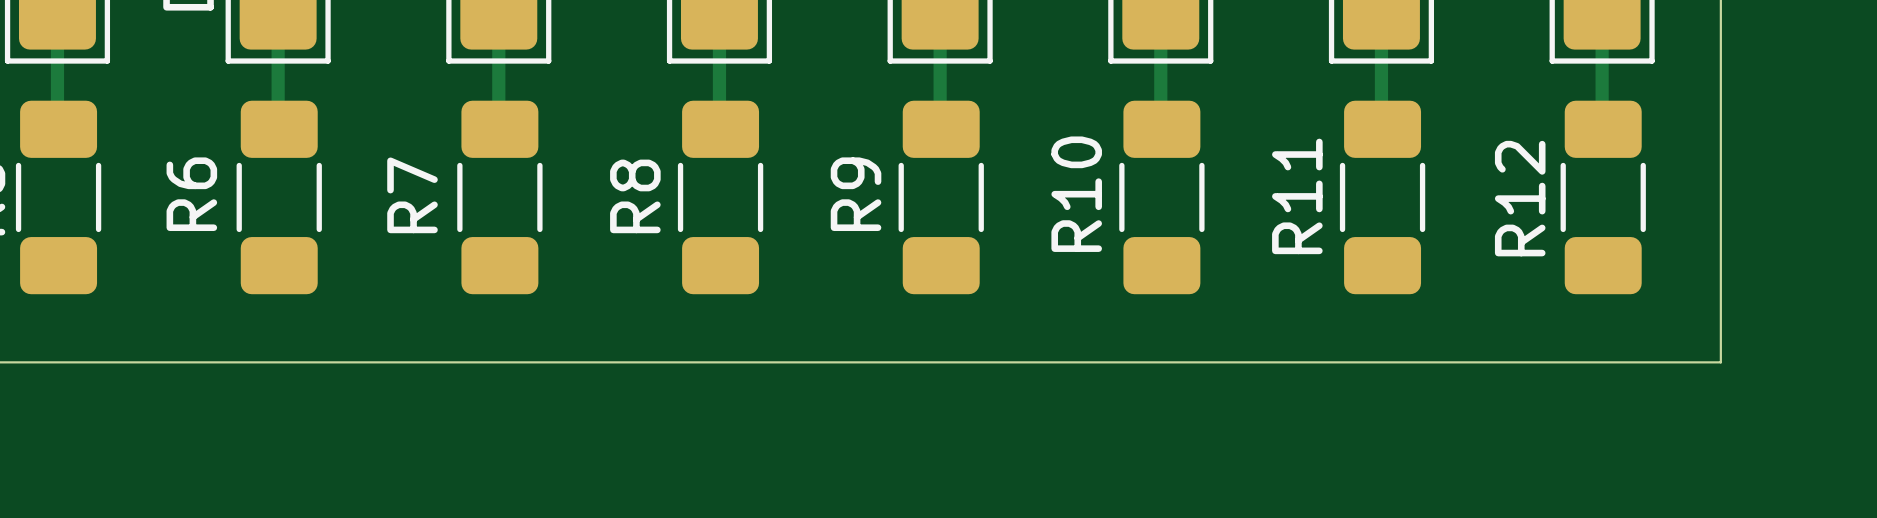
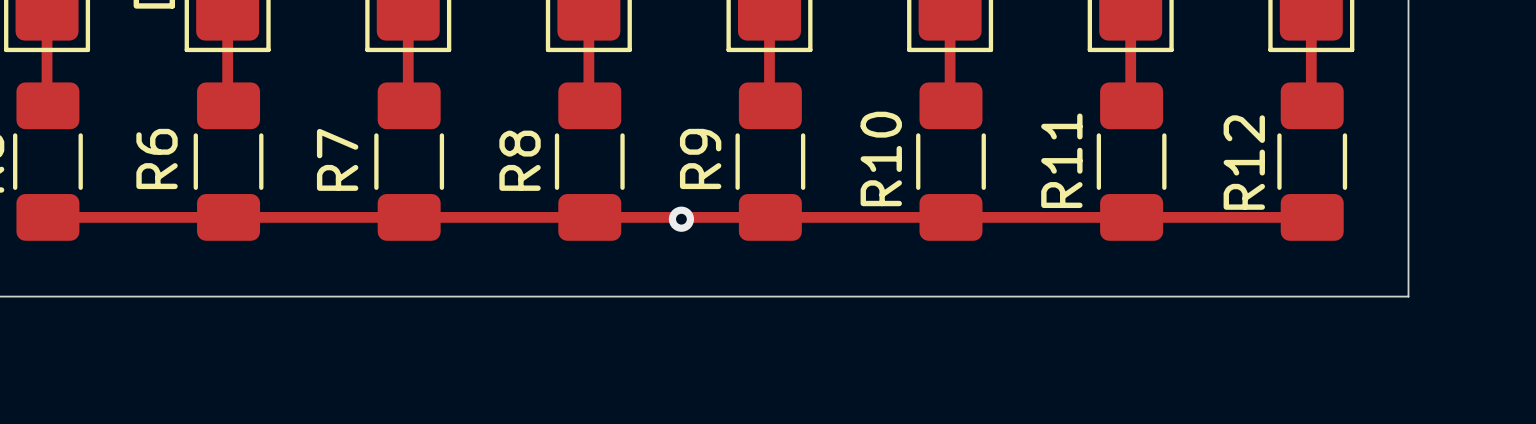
track: none -> (47, 217) (1312, 217)
via: none -> (681, 219)

